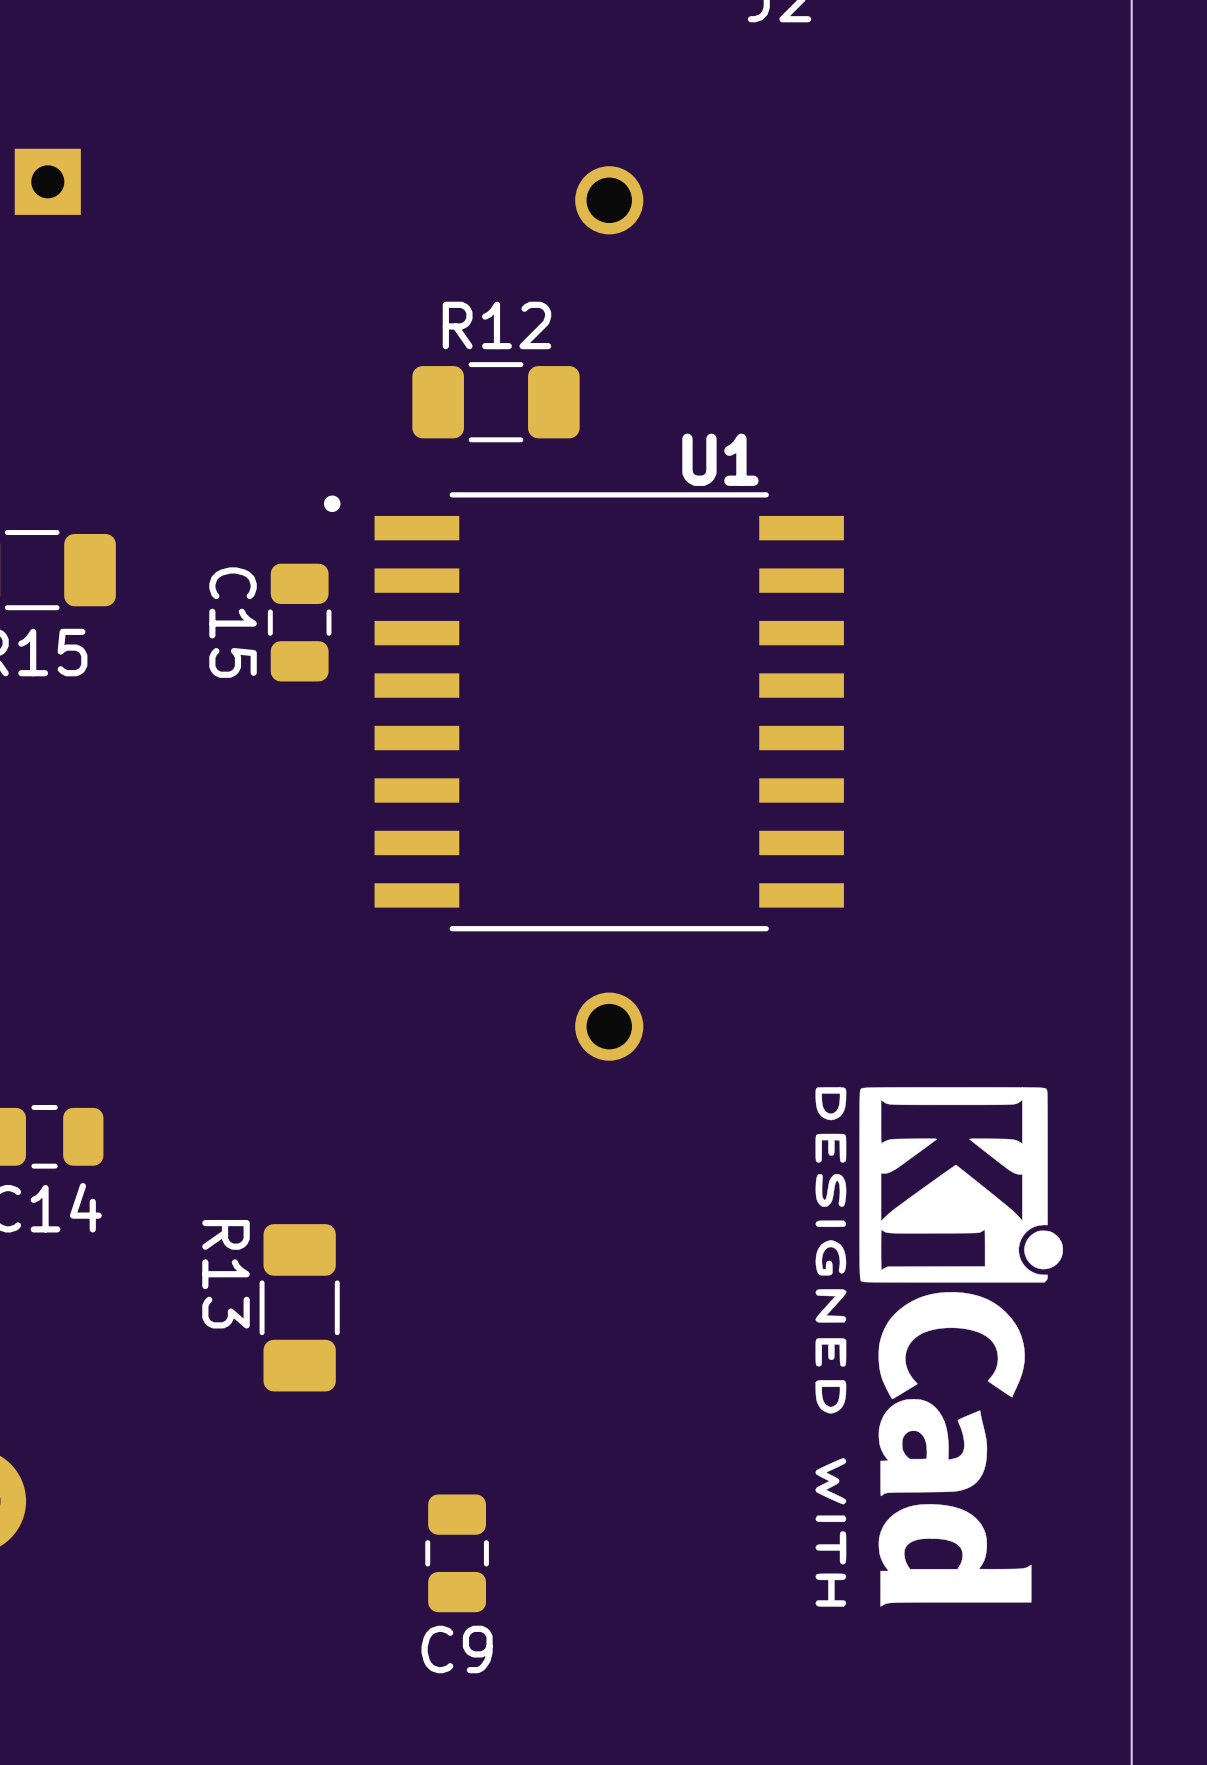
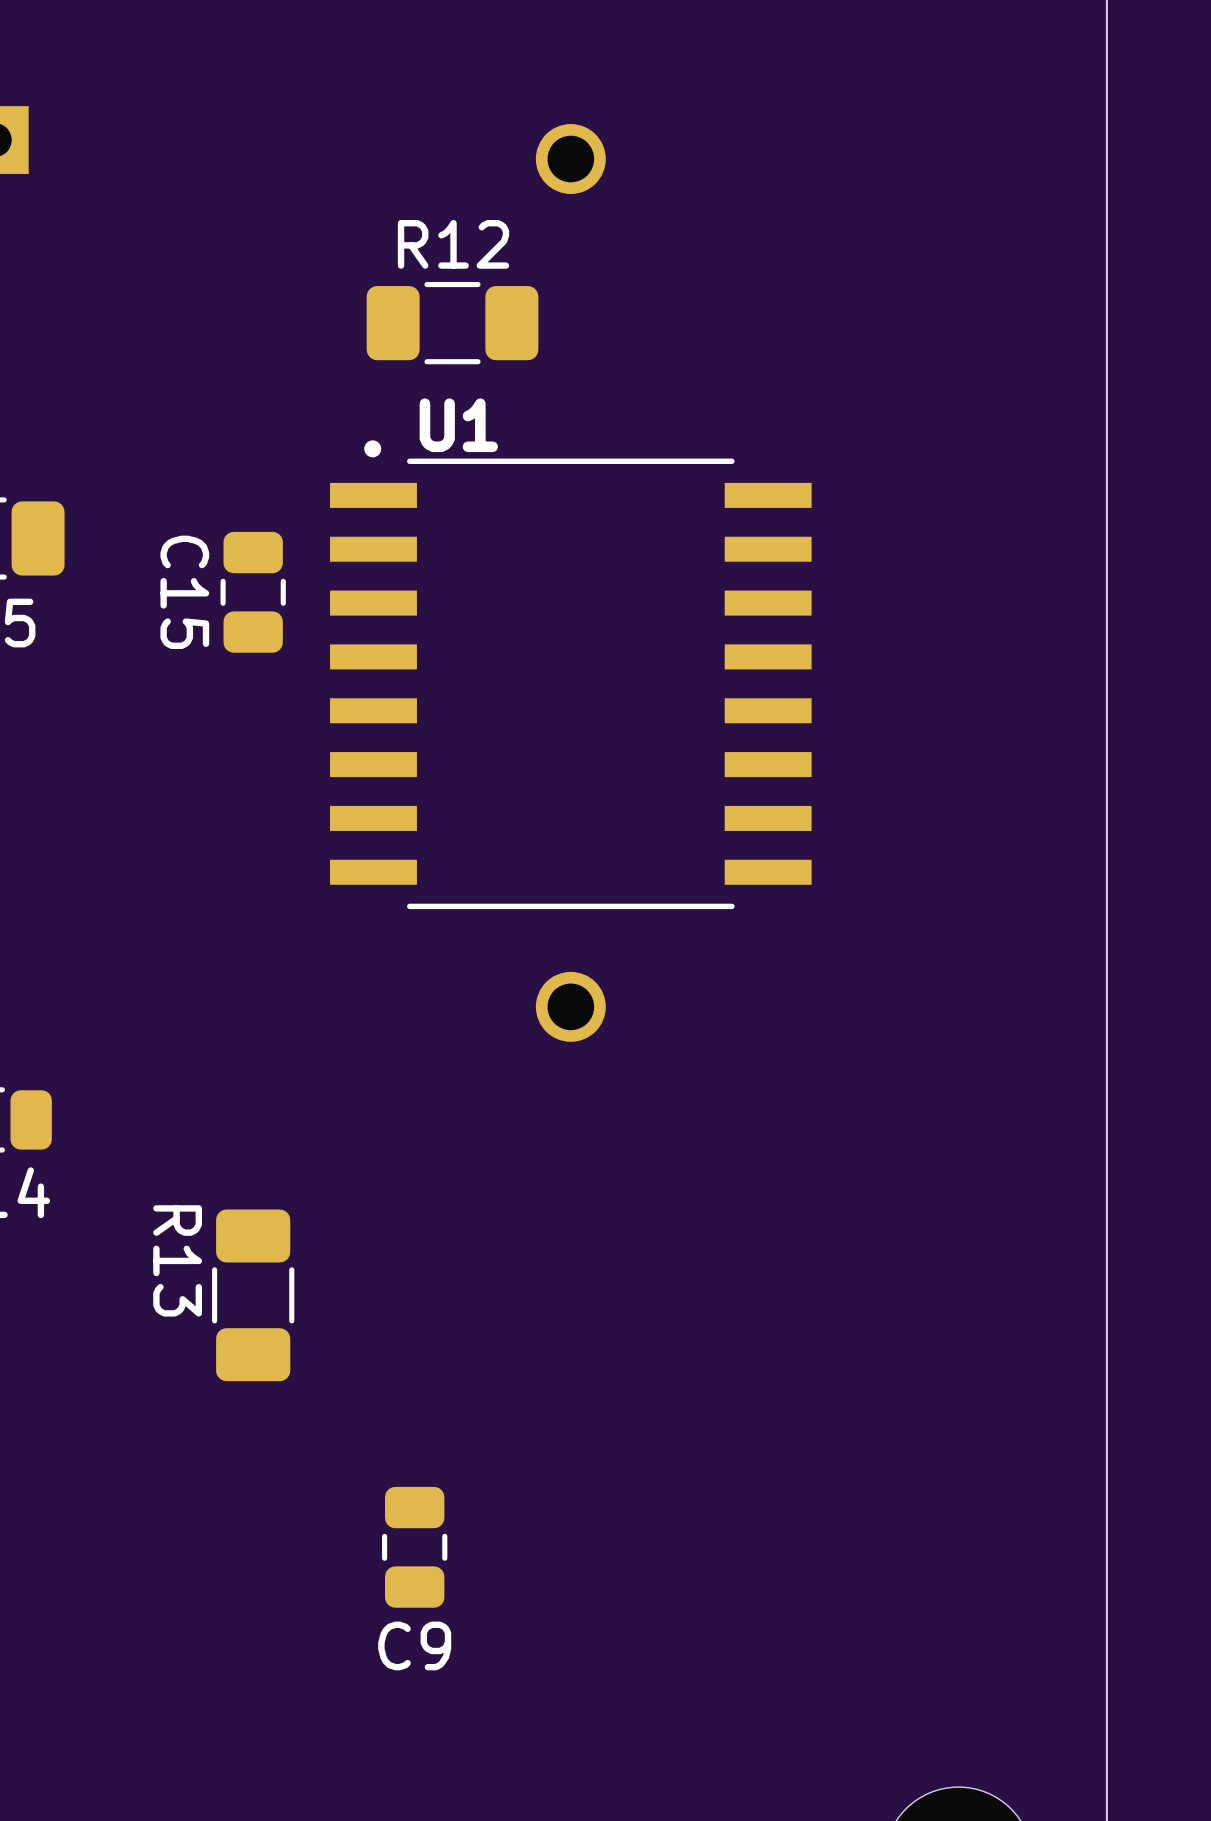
R12 position: (496, 402) -> (452, 323)
U1 name position: U1 (720, 459) -> U1 (458, 425)
U1 footprint: [323, 492, 844, 932] -> [330, 440, 812, 910]
drawing: [815, 1087, 1064, 1607] -> none

